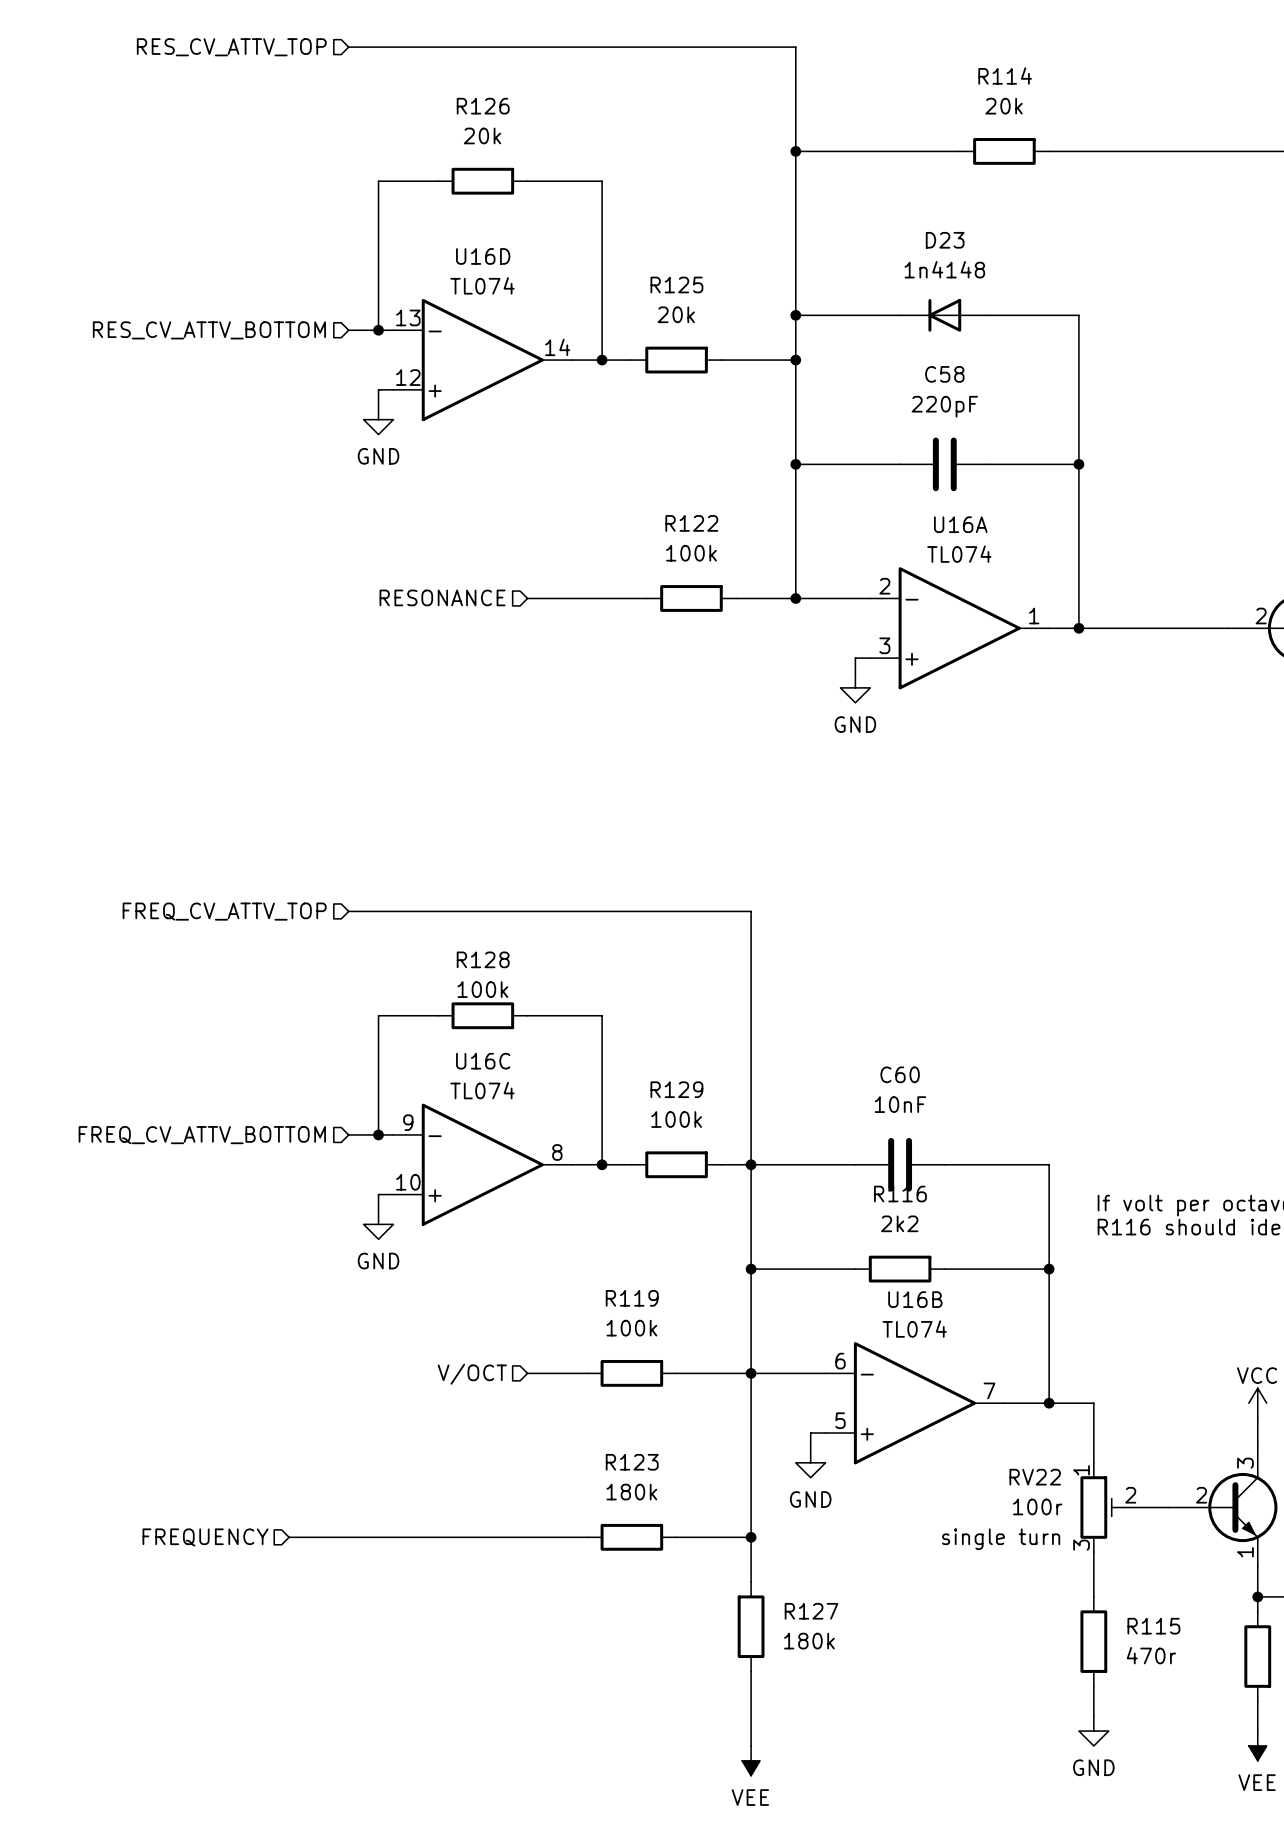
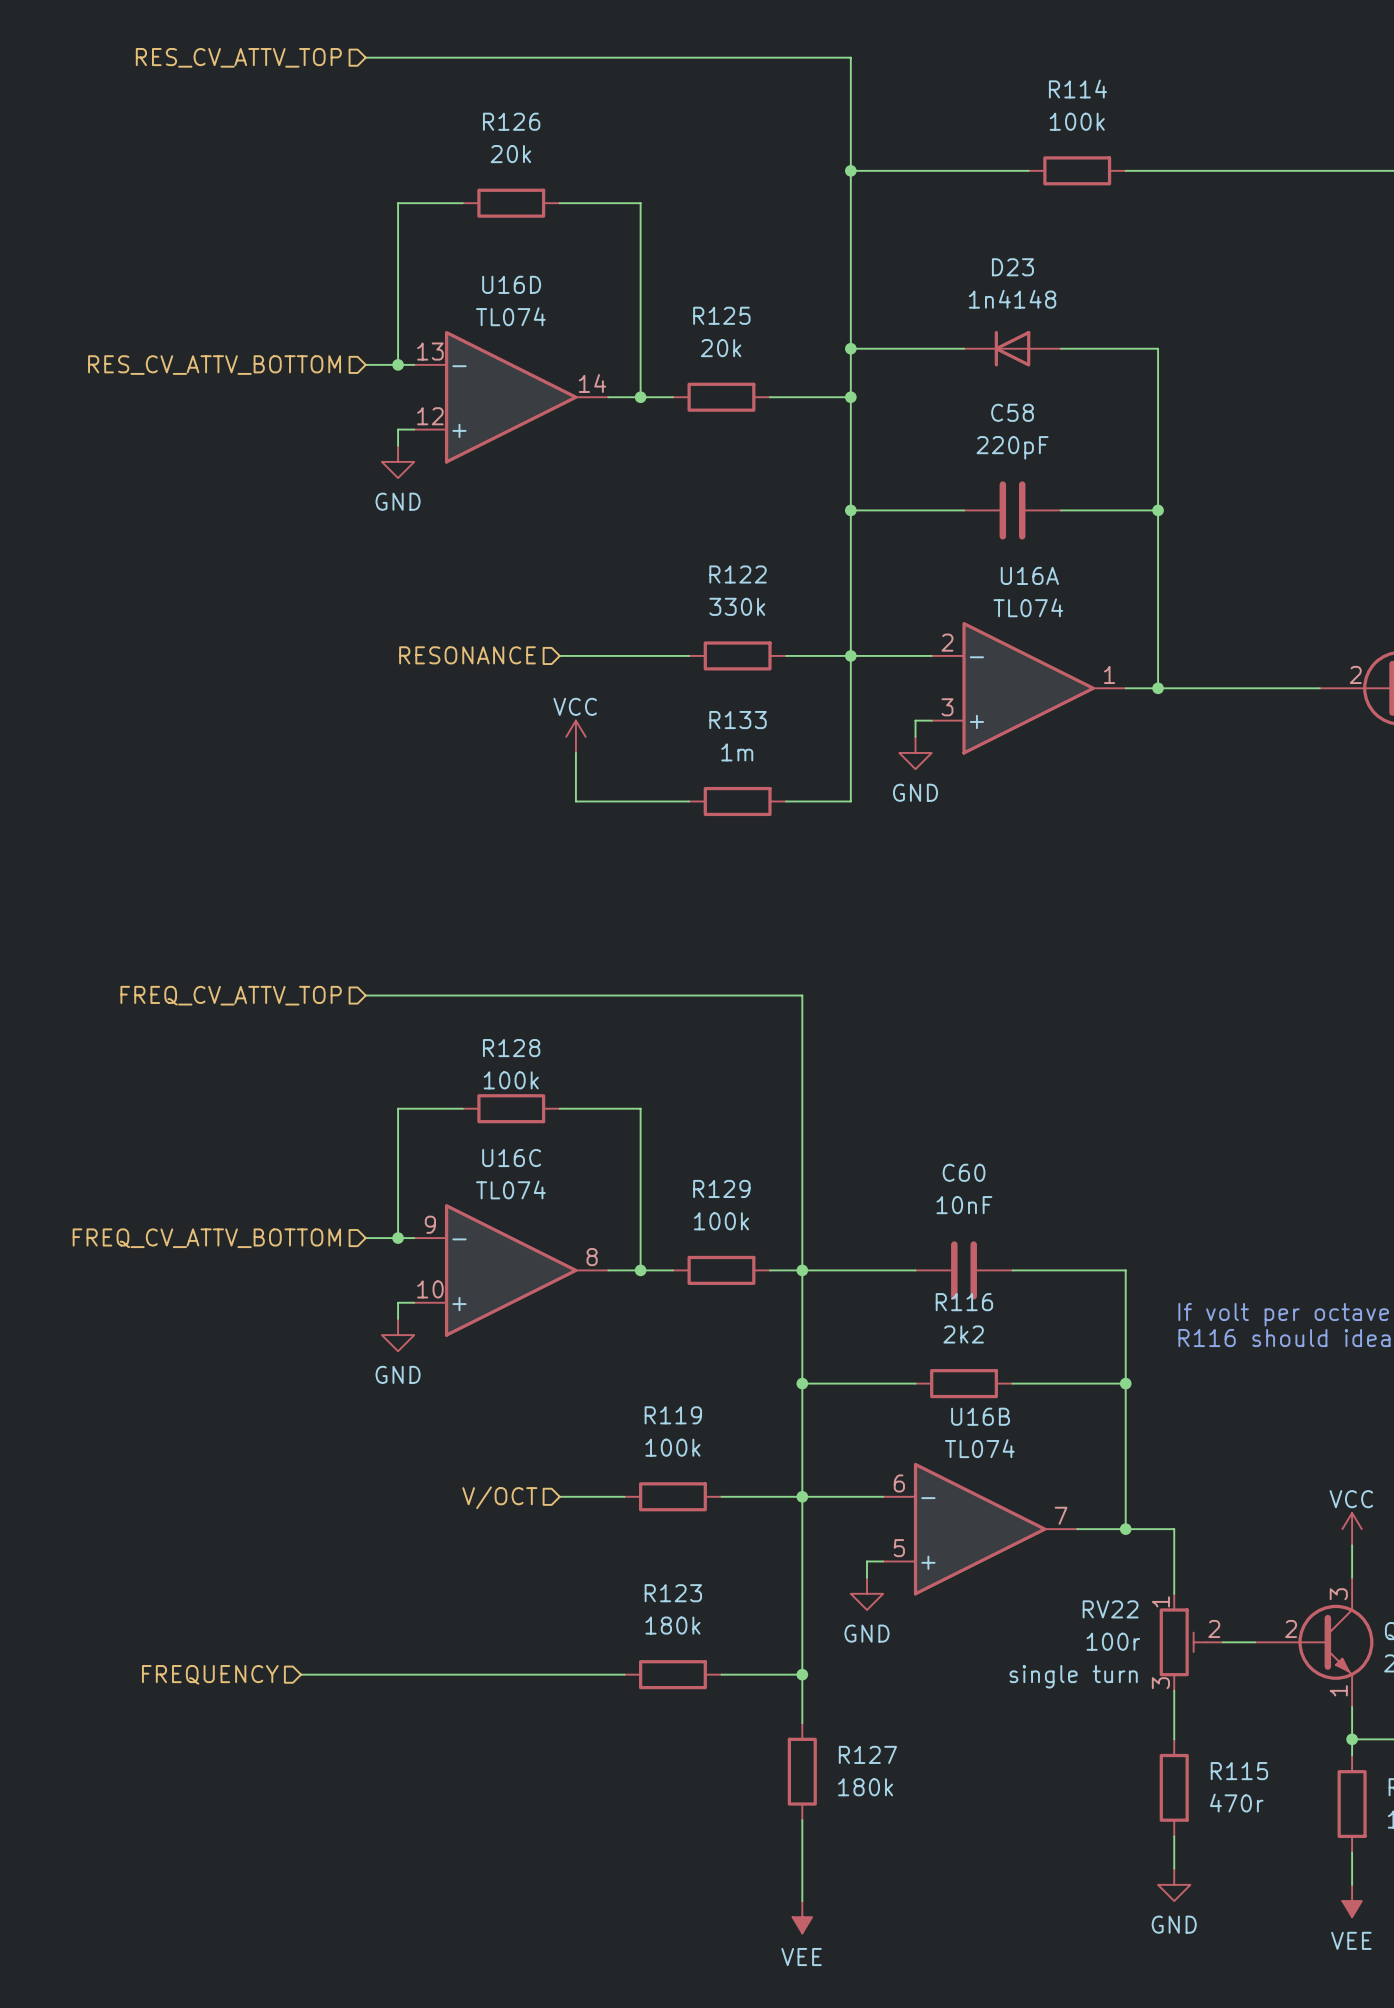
R114 value: 20k (1004, 106) -> 100k (1077, 121)
R122 value: 100k (691, 553) -> 330k (737, 606)
wire: none -> (850, 655) (850, 801) (786, 801)
power symbol: none -> VCC (575, 736)
wire: none -> (575, 752) (575, 801) (689, 801)
R133: none -> 1m (737, 801)

